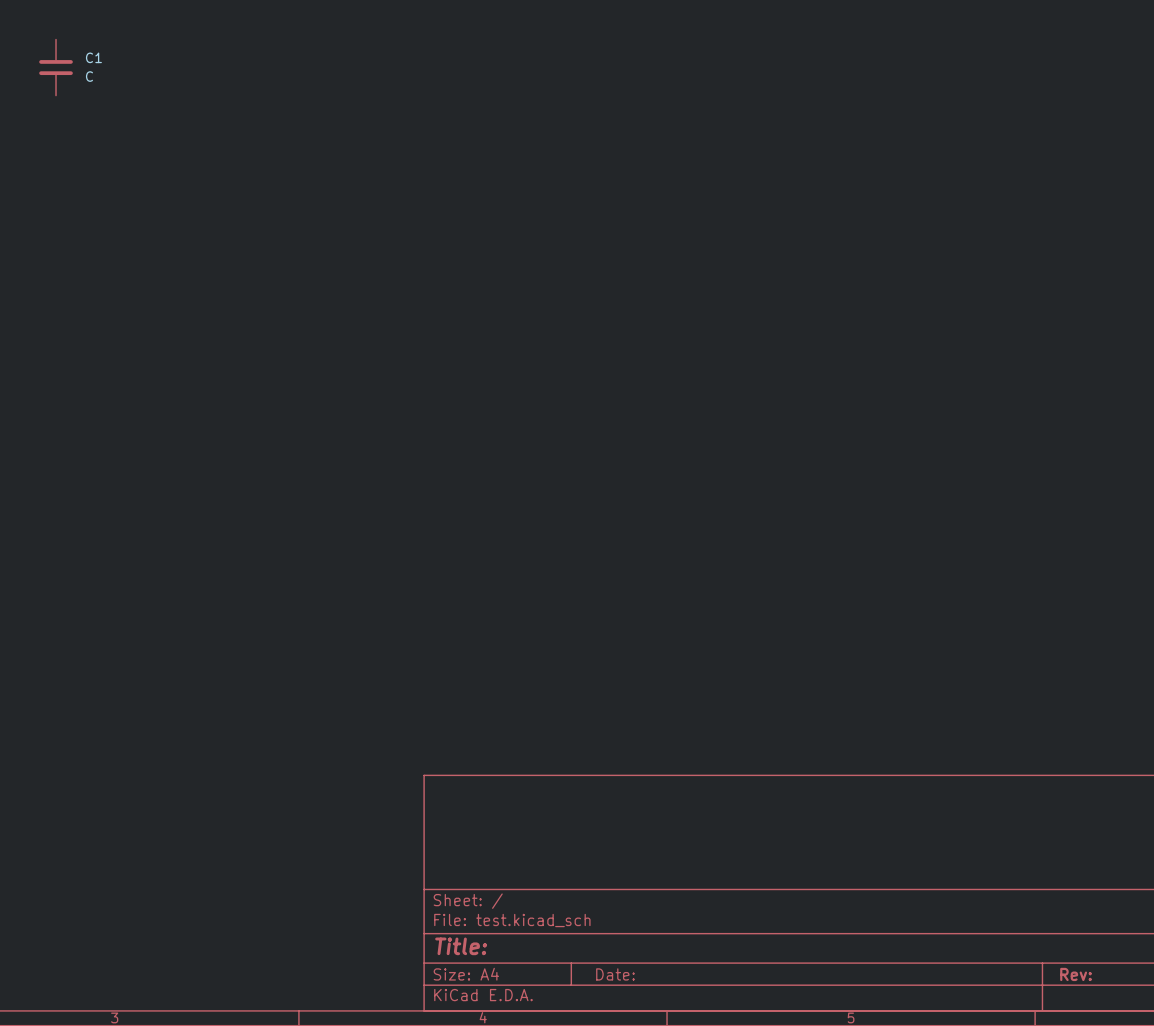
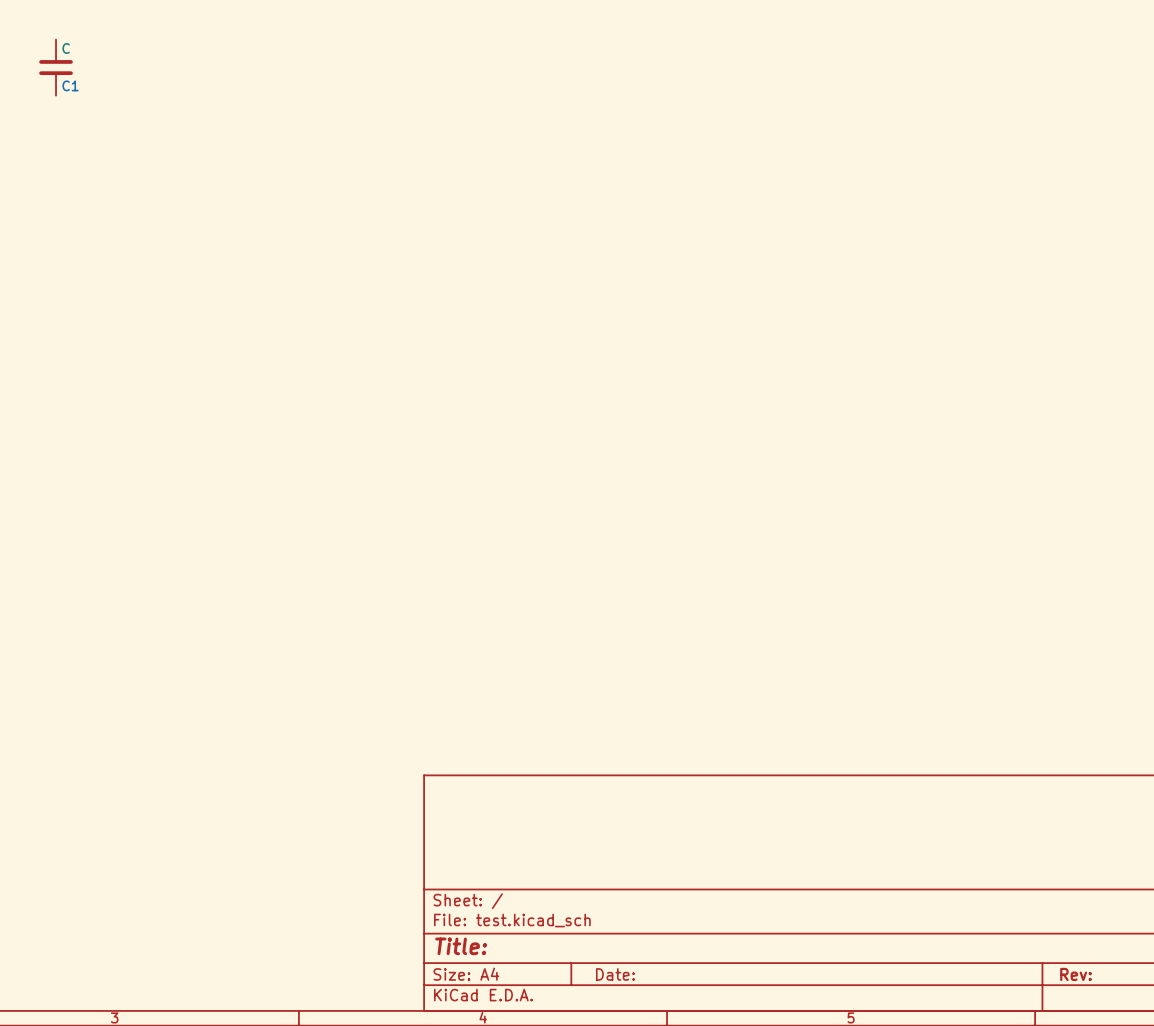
C1 name position: C1 (93, 57) -> C1 (70, 85)
C1 value position: C (89, 76) -> C (66, 48)

